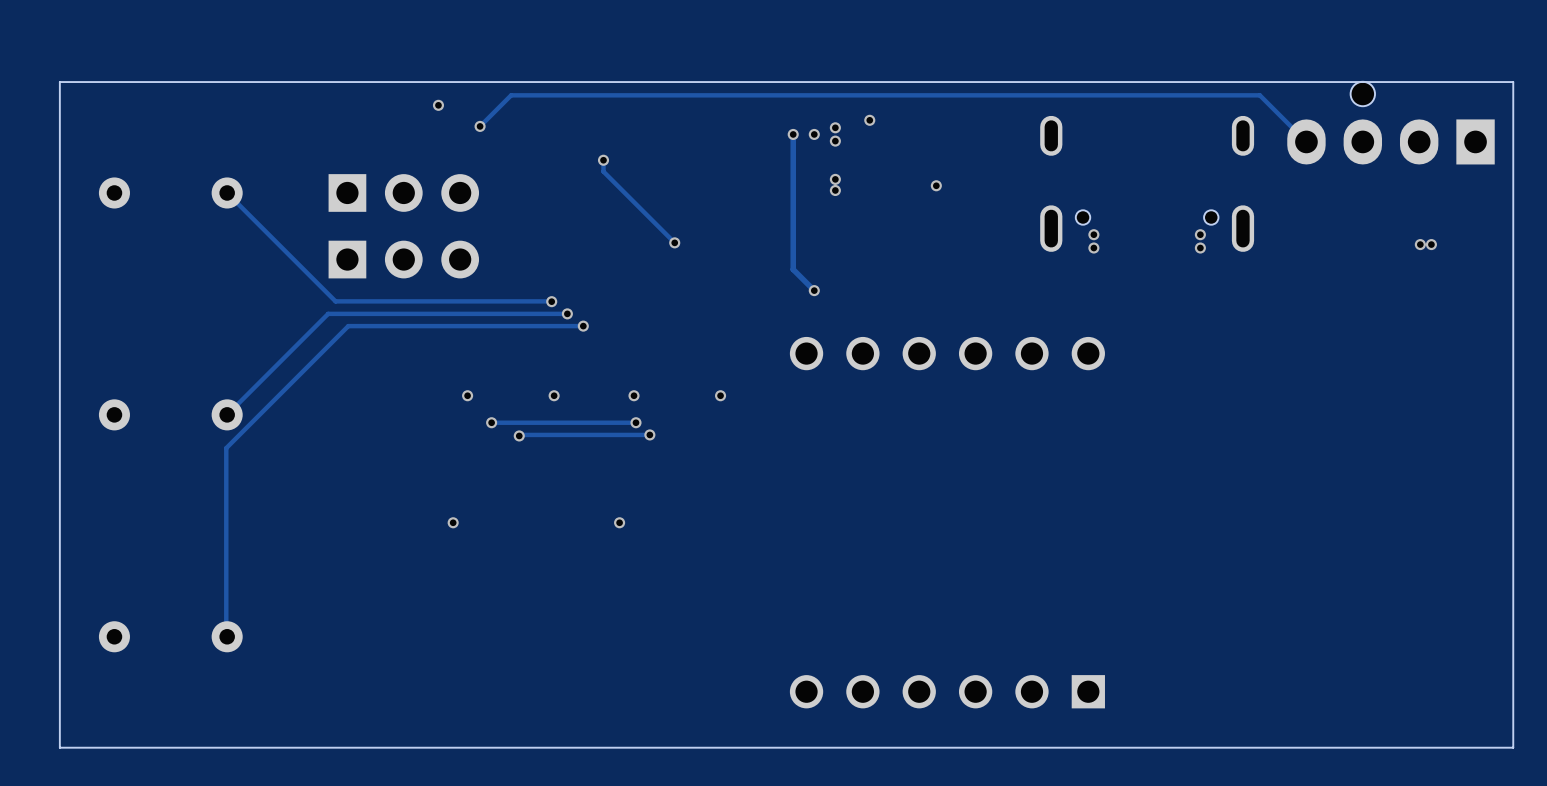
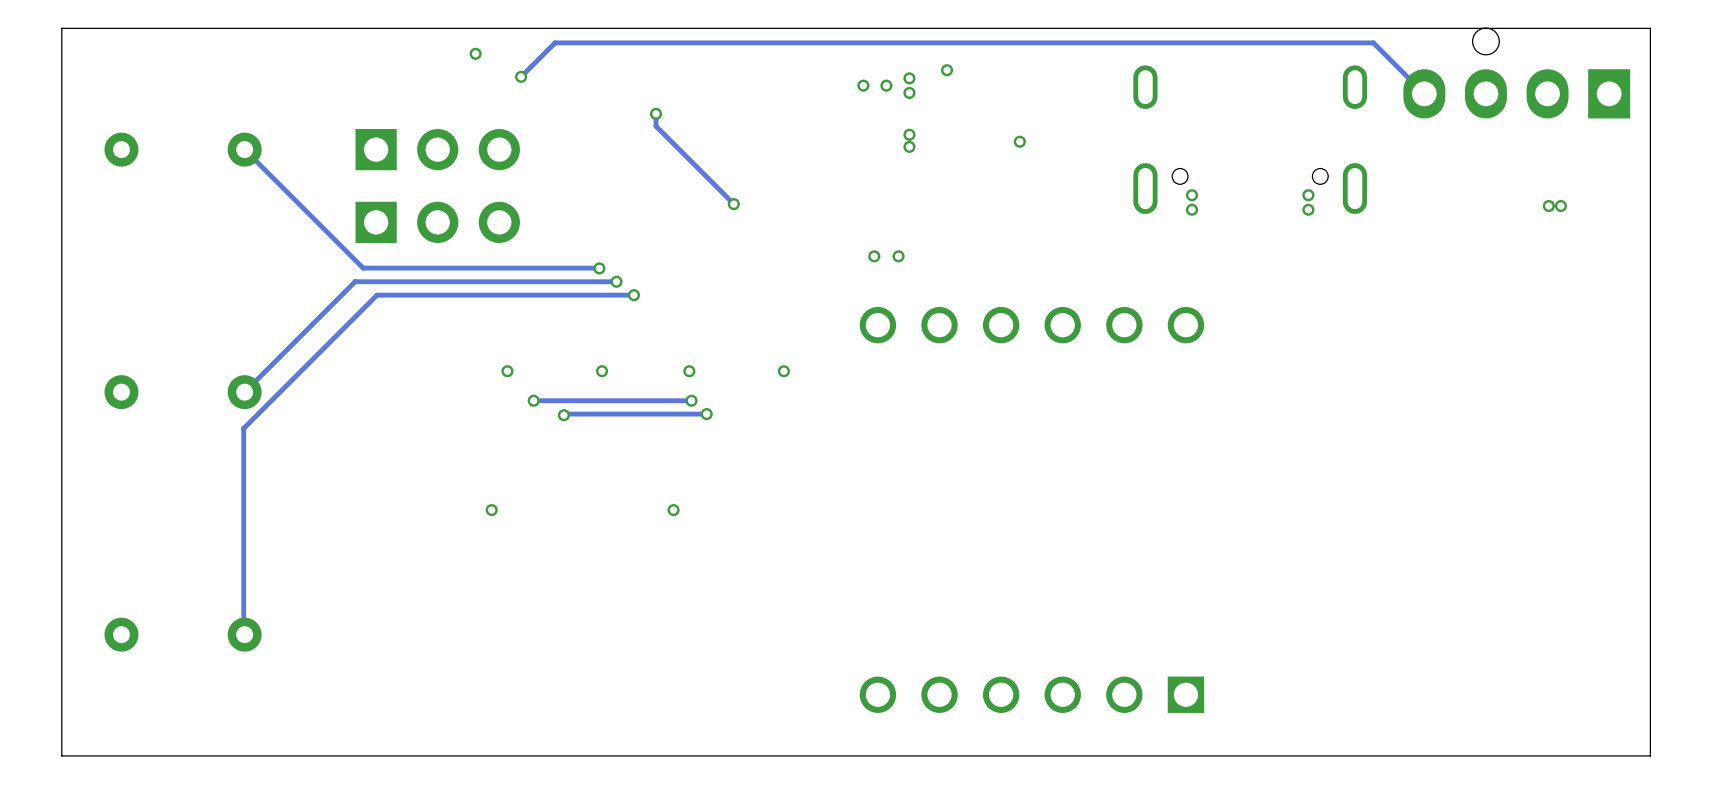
track: (793, 134) (793, 269) (814, 290) -> none
via: none -> (874, 256)
via: (814, 290) -> none
via: none -> (898, 256)

